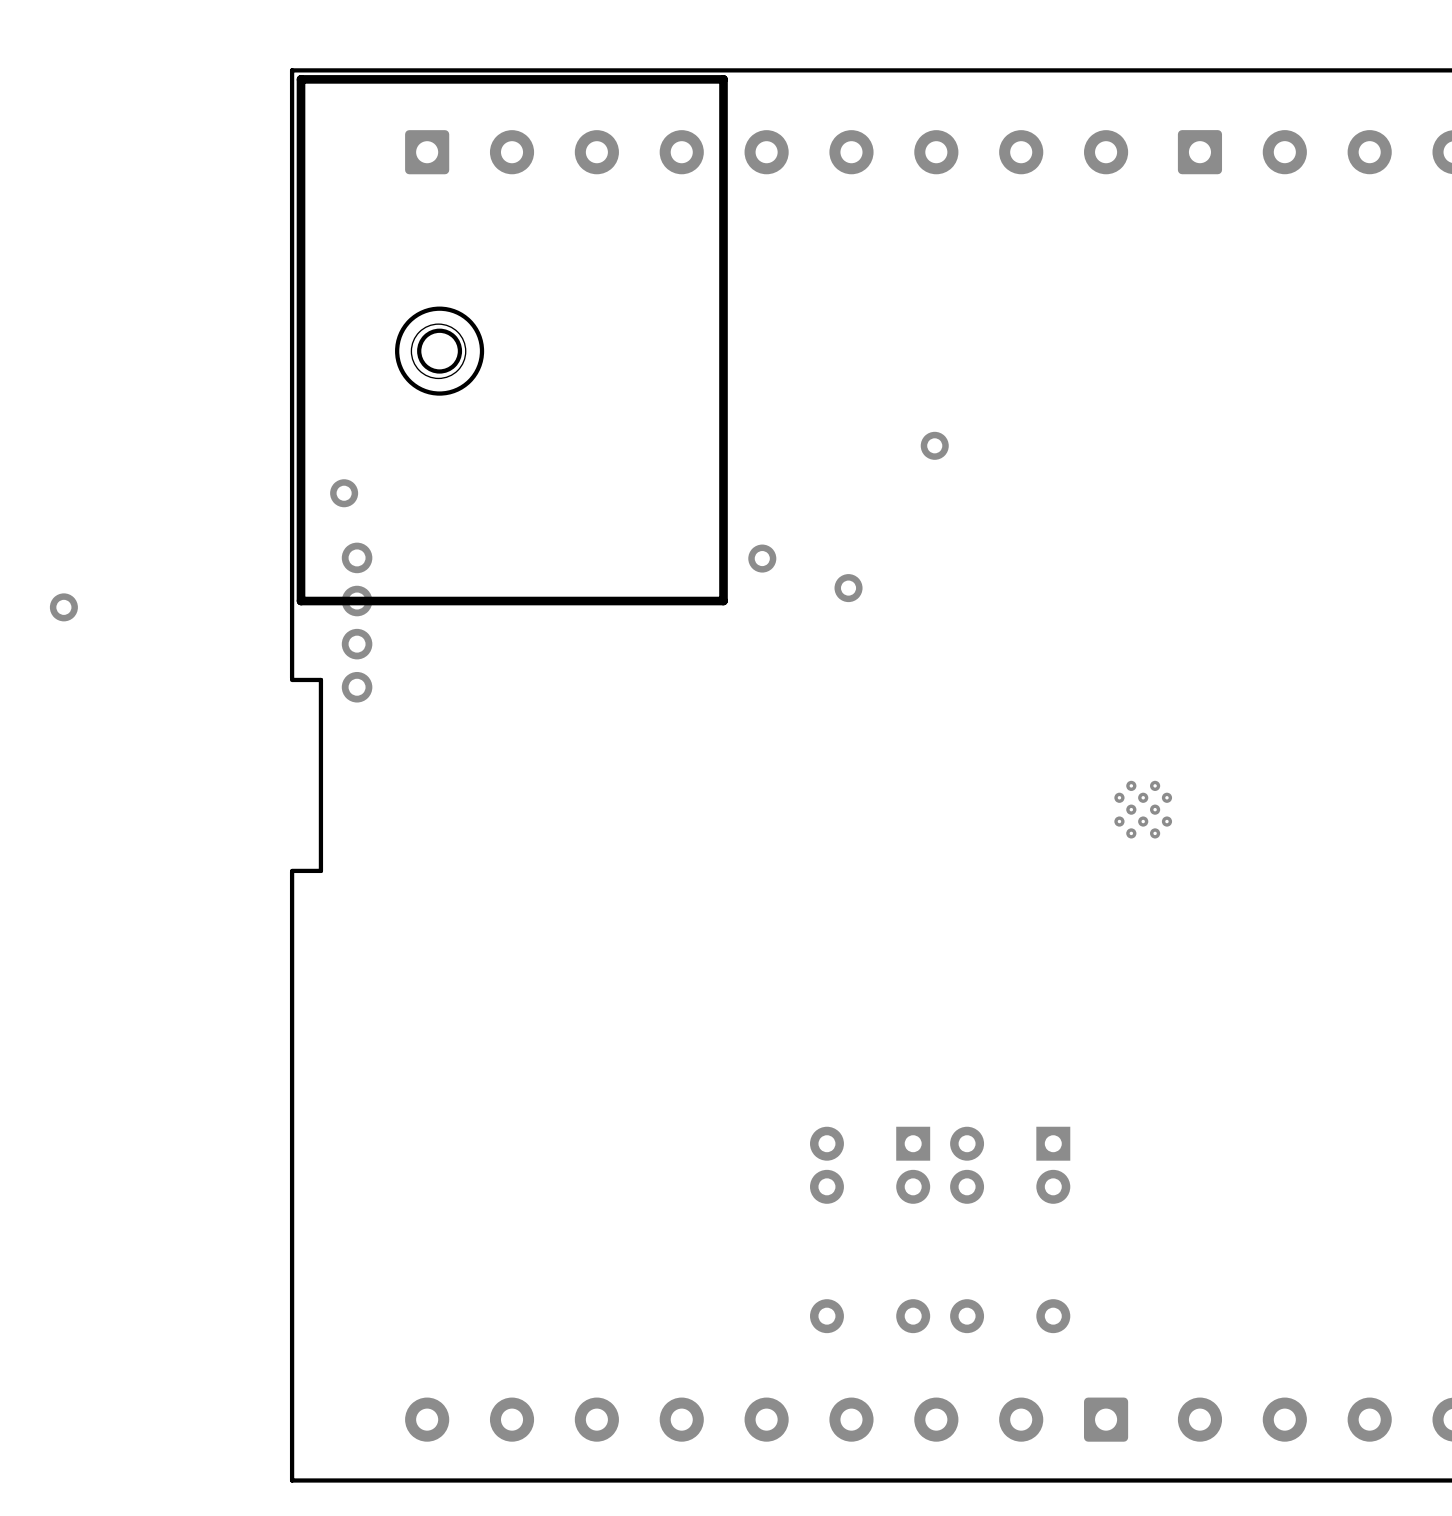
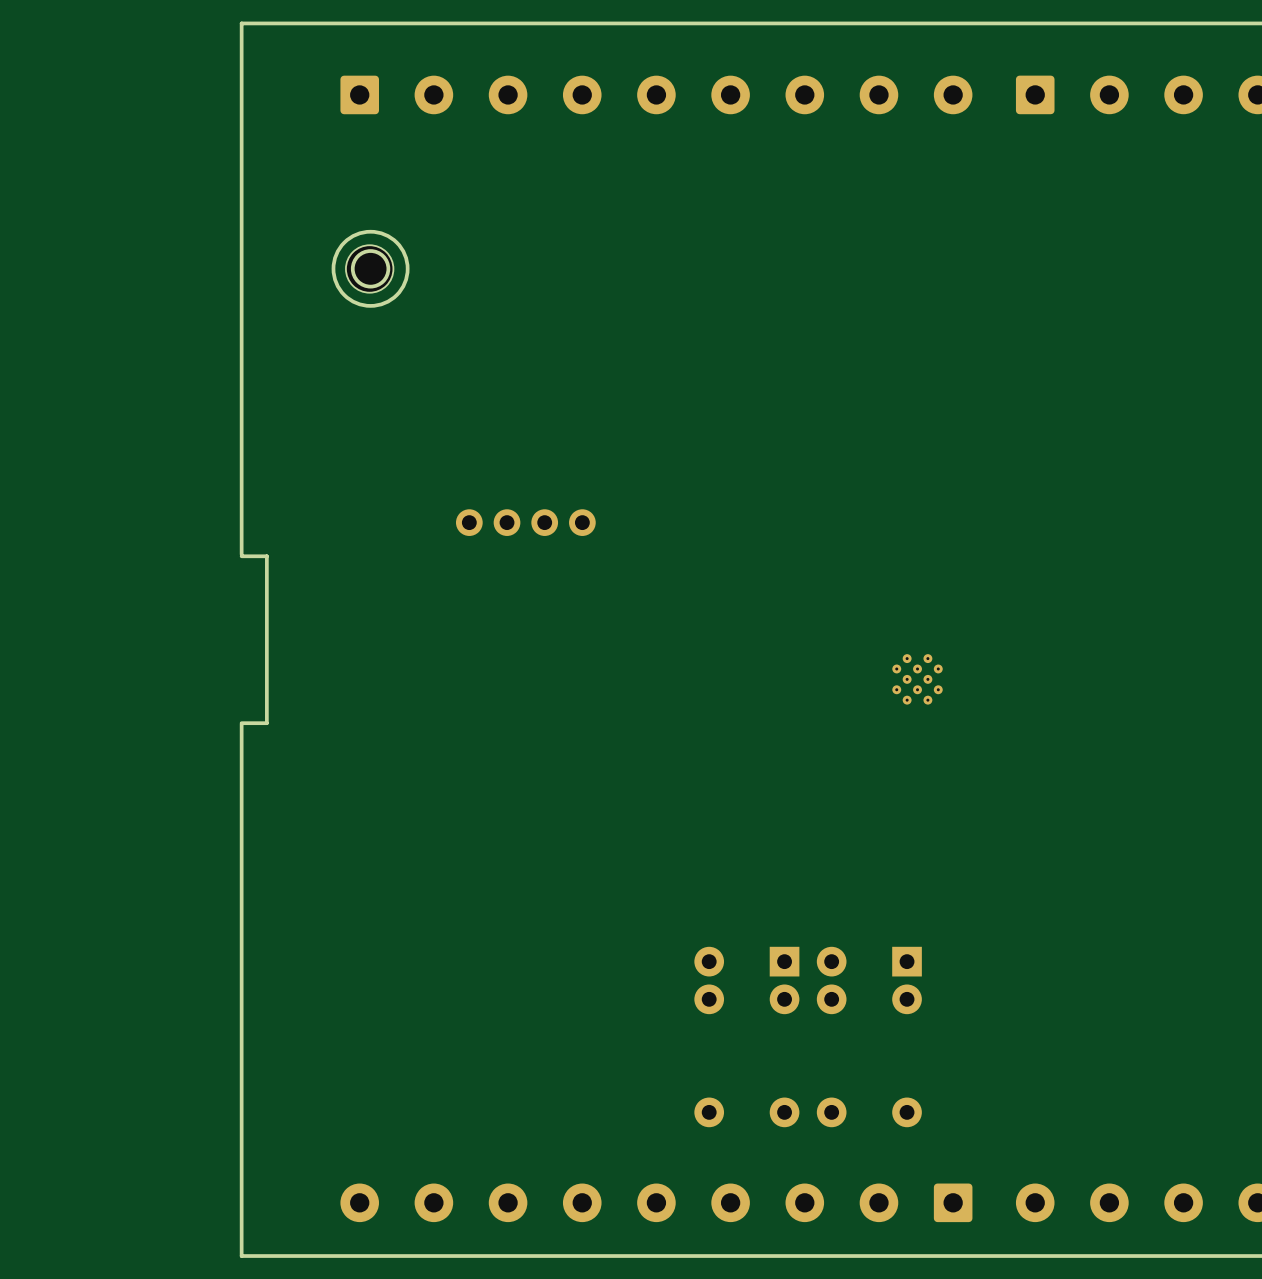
board edge: (723, 79) (301, 79) (301, 601) (723, 601) (723, 79) -> none
part: (934, 445) -> none
part: (344, 493) -> none
part: (762, 558) -> none
part: (848, 588) -> none
part: (63, 607) -> none
part rotation: 0° (357, 622) -> 90° clockwise (525, 522)
part position: (357, 622) -> (525, 522)
part position: (1143, 809) -> (917, 679)

